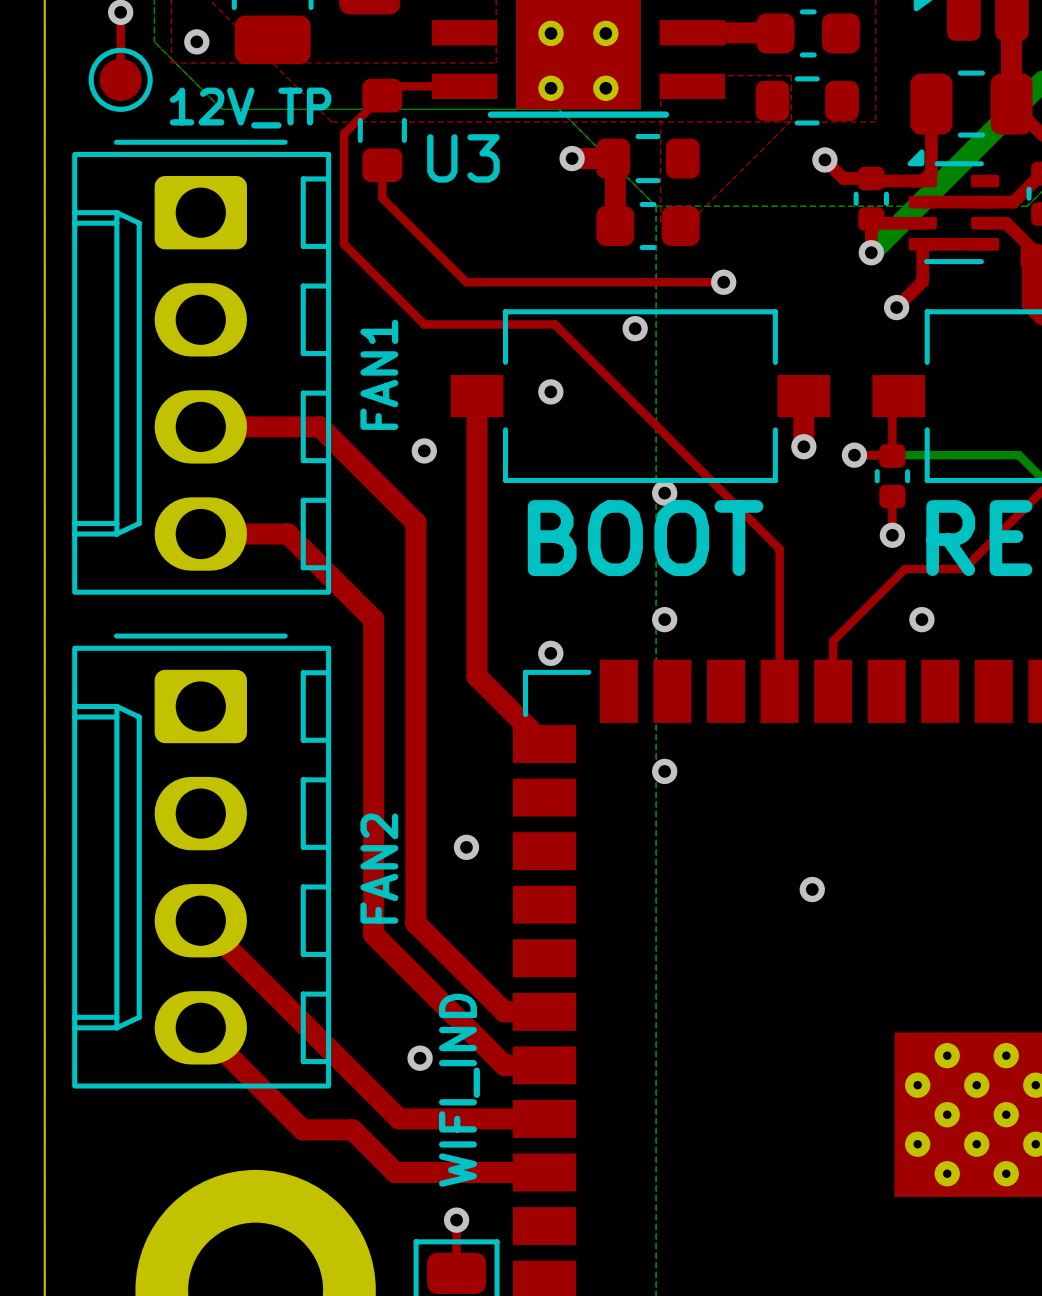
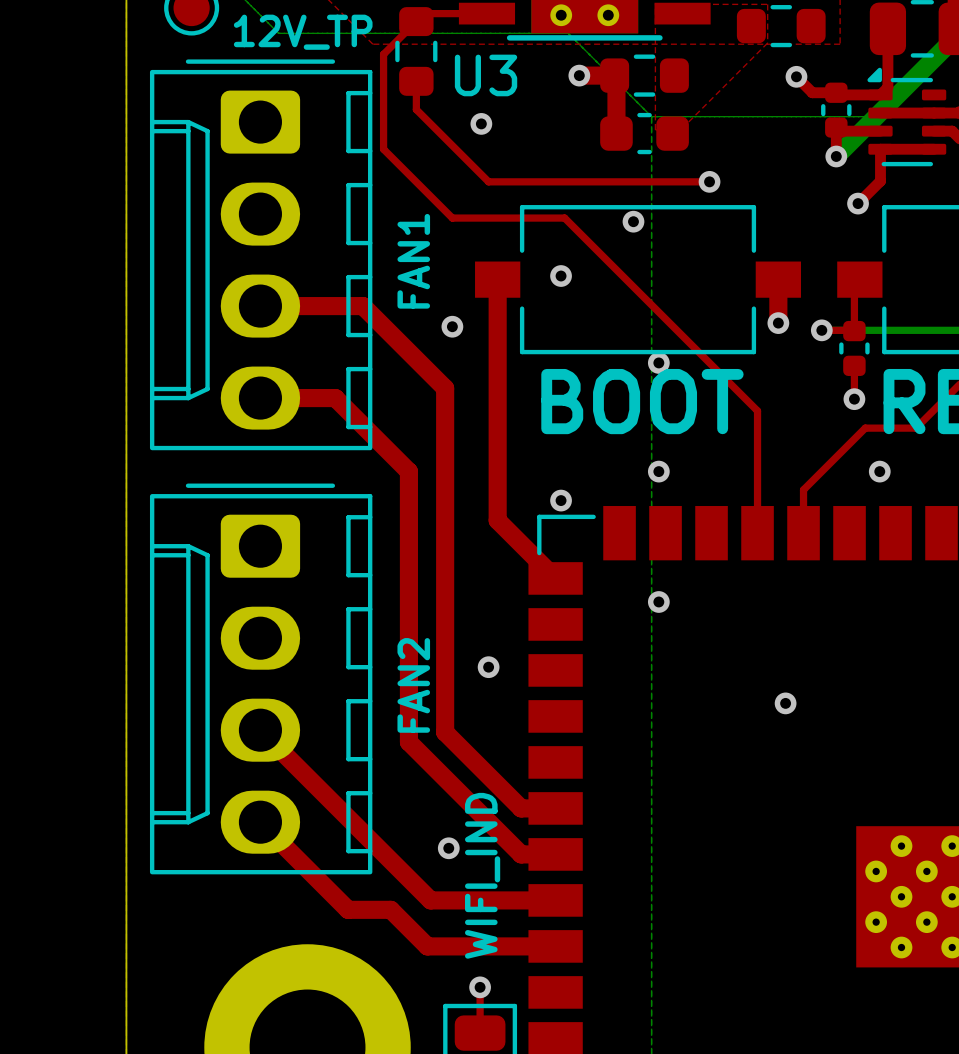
via: none -> (481, 123)

